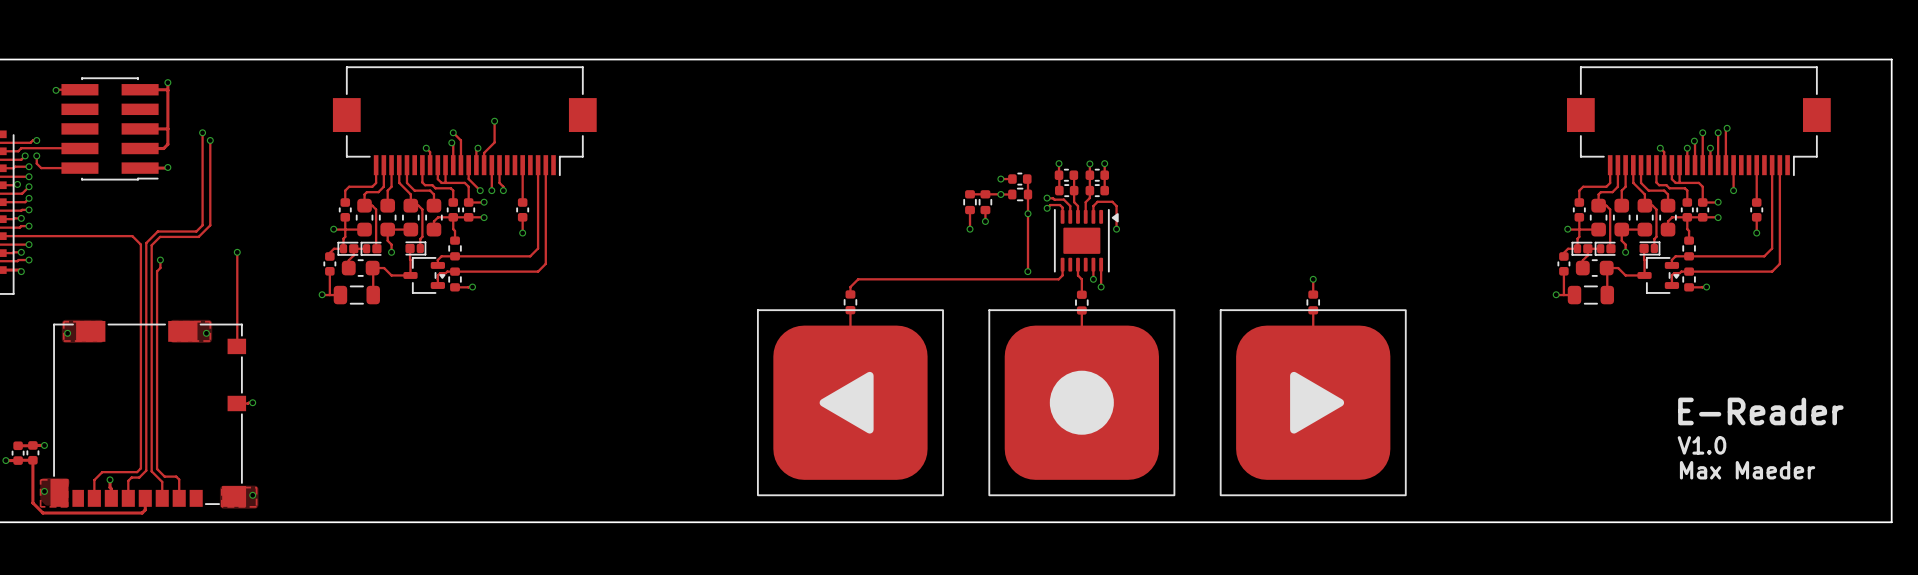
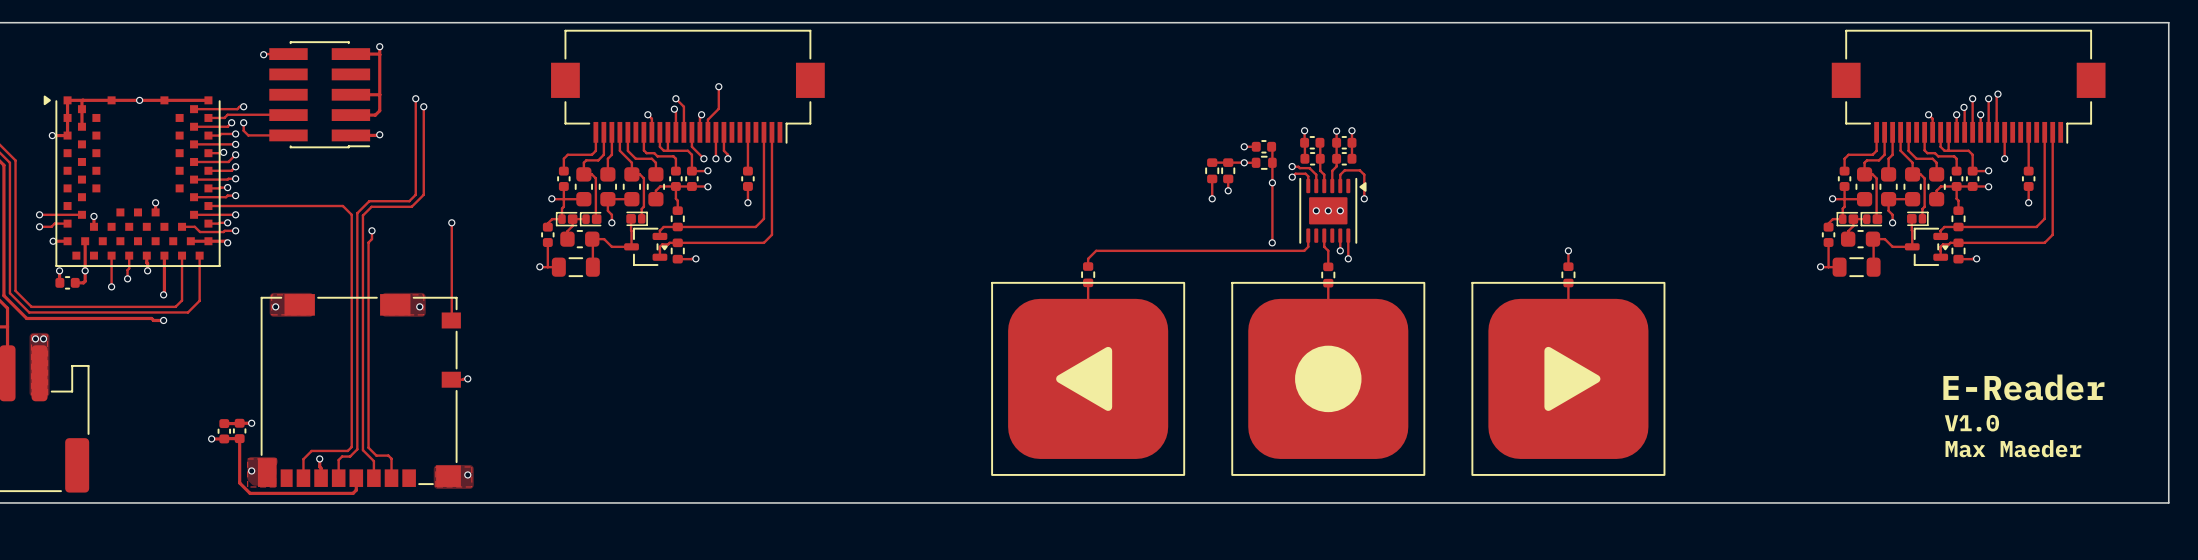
via: none -> (1316, 210)
via: none -> (1328, 210)
via: none -> (1340, 210)

